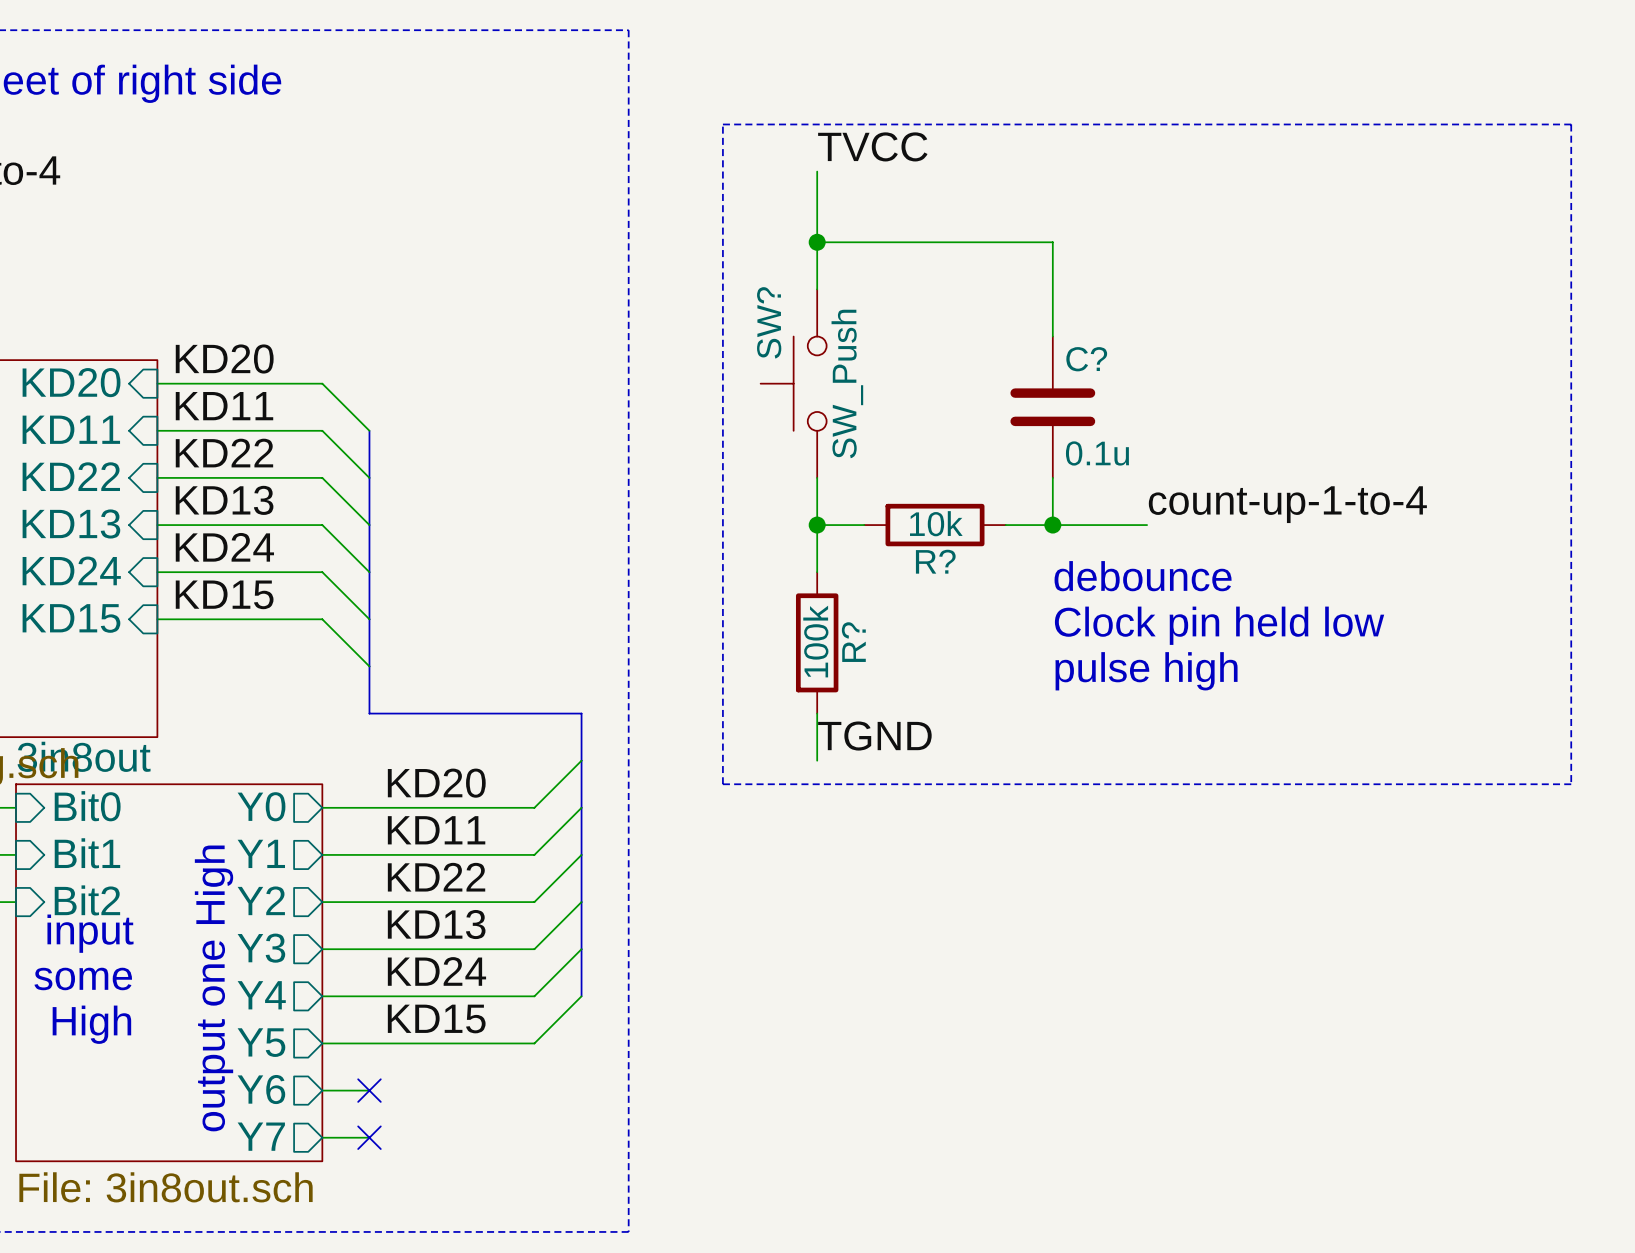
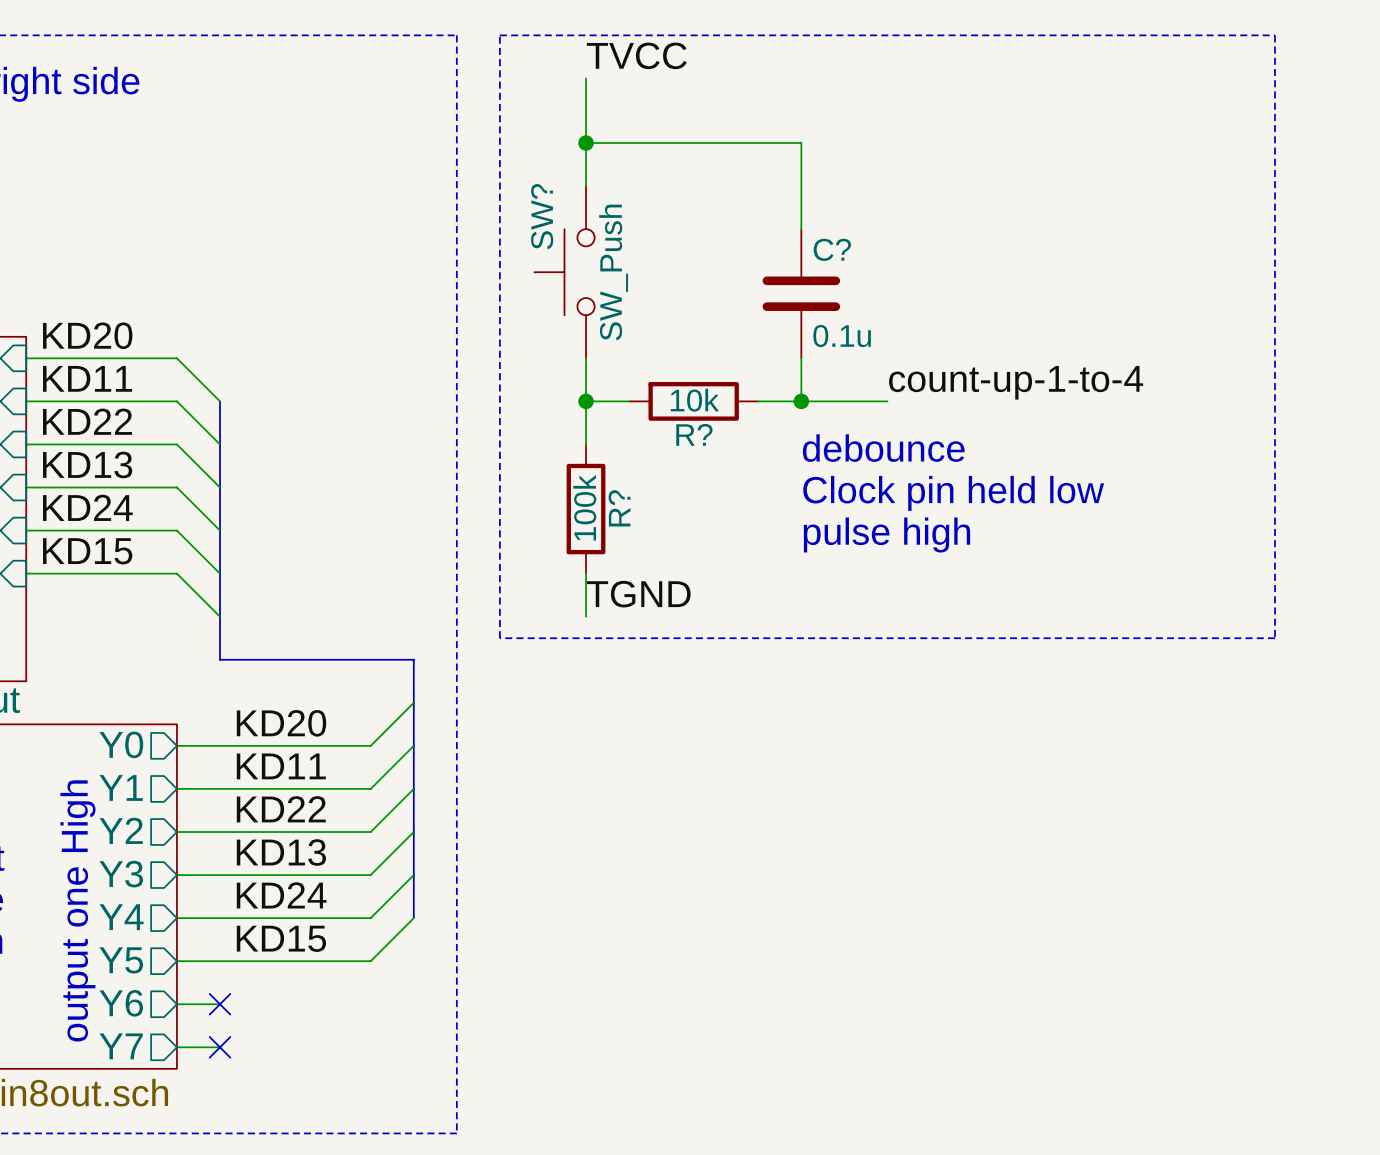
line: (722, 124) (722, 784) (1571, 784) (1571, 124) (722, 124) -> (499, 35) (499, 638) (1275, 638) (1275, 35) (499, 35)
label position: TVCC (872, 146) -> TVCC (636, 55)
junction: none -> (586, 143)
wire: (817, 171) (817, 289) -> (586, 78) (586, 186)
wire: (817, 242) (1052, 242) (1052, 336) -> (586, 143) (801, 143) (801, 229)
junction: (817, 242) -> none
SW? position: (793, 383) -> (564, 272)
C? position: (1052, 407) -> (801, 293)
junction: none -> (586, 401)
junction: none -> (801, 401)
wire: (817, 477) (817, 572) -> (586, 358) (586, 444)
wire: (1052, 477) (1052, 525) -> (801, 358) (801, 401)
label position: count-up-1-to-4 (1287, 504) -> count-up-1-to-4 (1016, 382)
wire: (817, 525) (864, 525) -> (586, 401) (629, 401)
junction: (817, 525) -> none
R? position: (935, 525) -> (693, 401)
wire: (1005, 525) (1147, 525) -> (758, 401) (887, 401)
junction: (1052, 525) -> none
text position: debounce (1143, 576) -> debounce (883, 448)
text position: Clock pin held low (1219, 625) -> Clock pin held low (953, 493)
R? position: (817, 642) -> (586, 509)
text position: pulse high (1146, 671) -> pulse high (886, 534)
wire: (817, 713) (817, 760) -> (586, 573) (586, 616)
label position: TGND (874, 736) -> TGND (638, 594)

